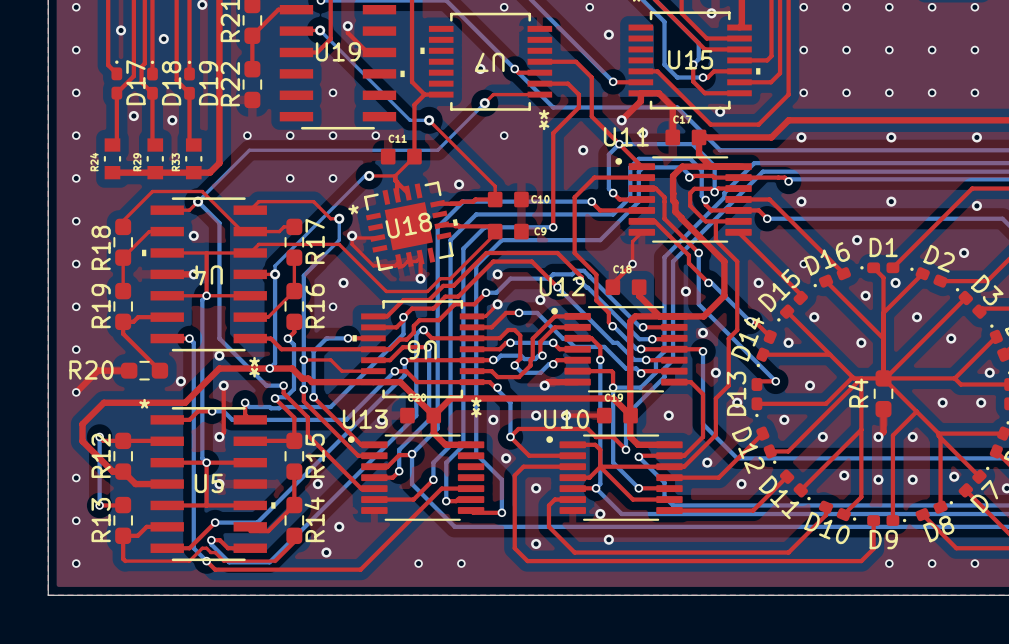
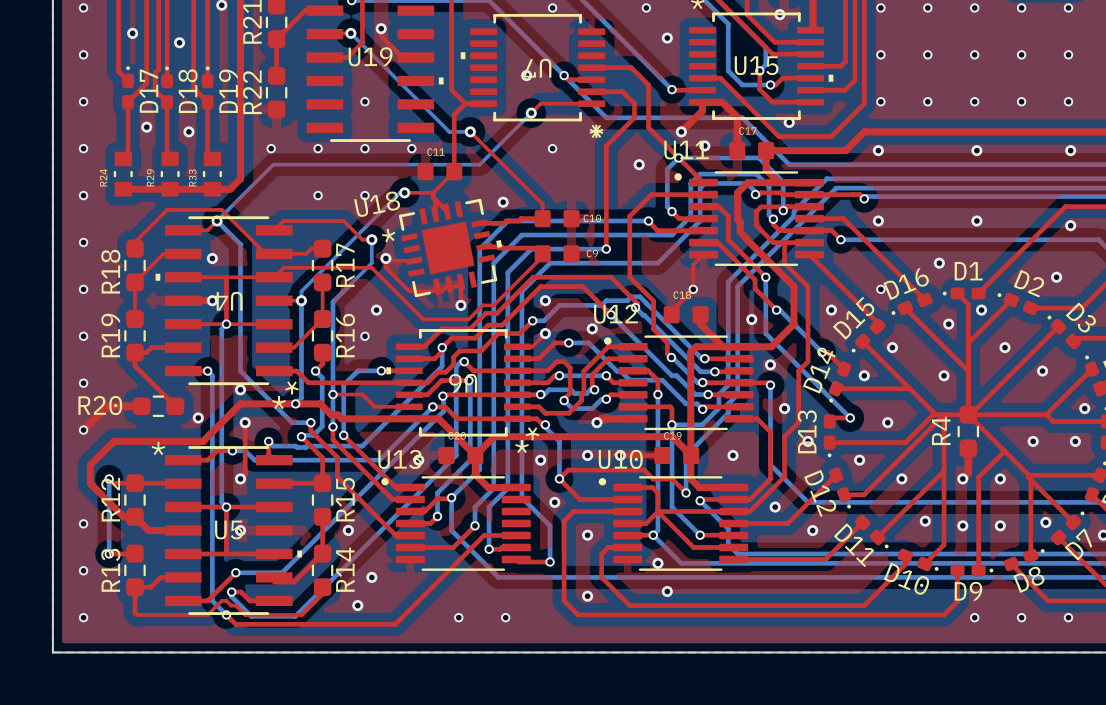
U4 footprint: [141, 197, 267, 352] -> [155, 216, 293, 386]
U18 name position: U18 (408, 225) -> U18 (377, 204)
U6 footprint: [352, 300, 485, 399] -> [386, 329, 531, 437]

